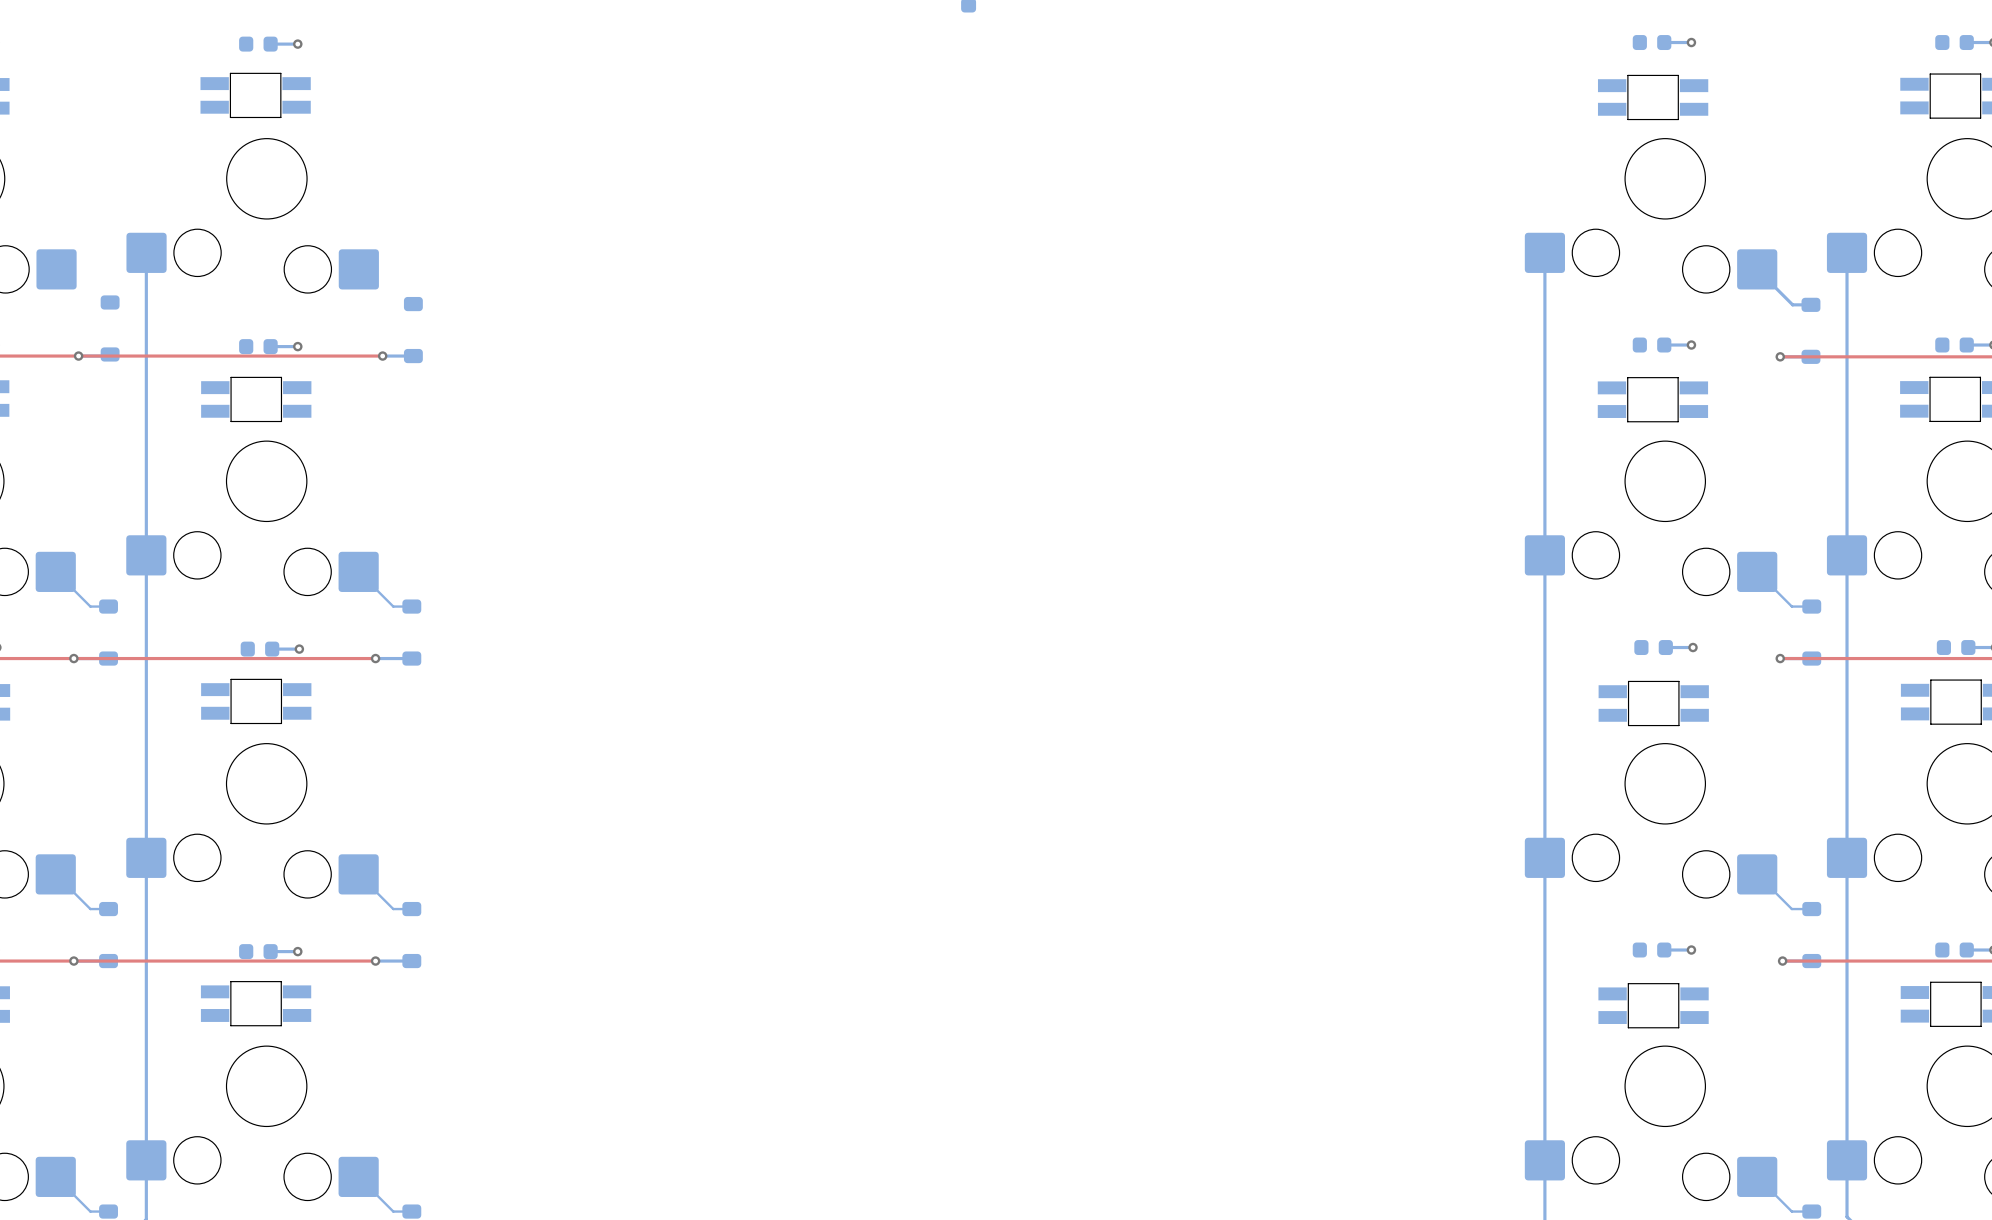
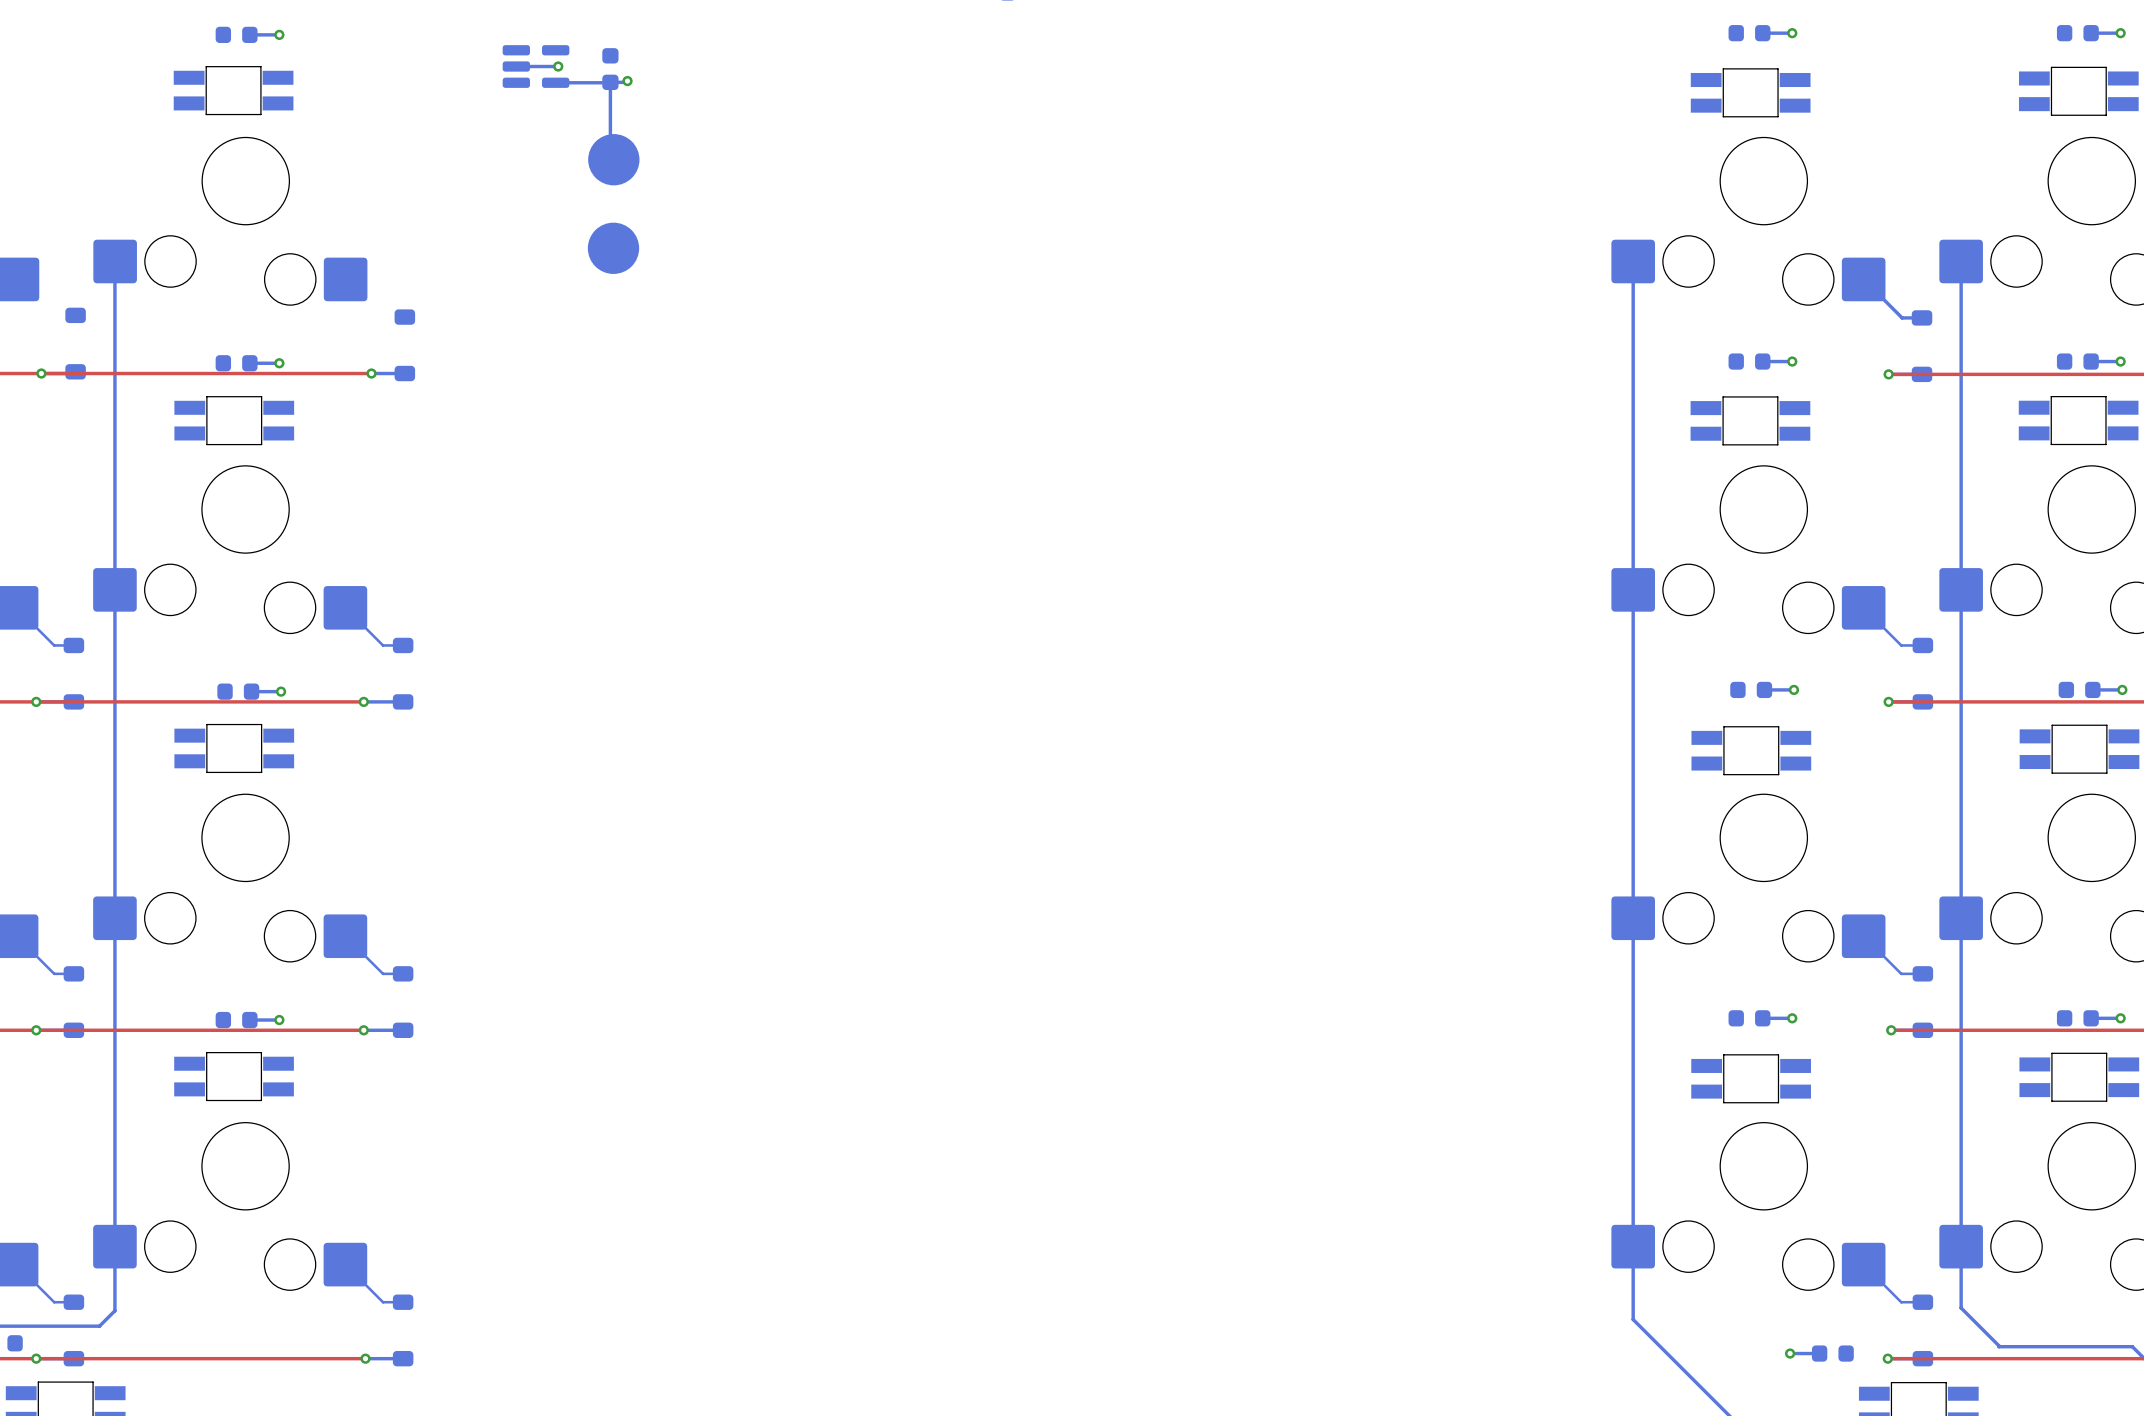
bottom track: none -> (516, 66) (558, 66)
part: none -> (536, 66)
via: none -> (558, 66)
part: none -> (610, 69)
bottom track: none -> (627, 81) (610, 82) (610, 156) (613, 159)
via: none -> (627, 81)
bottom track: none -> (555, 82) (608, 82)
part: none -> (613, 159)
part: none -> (613, 248)

